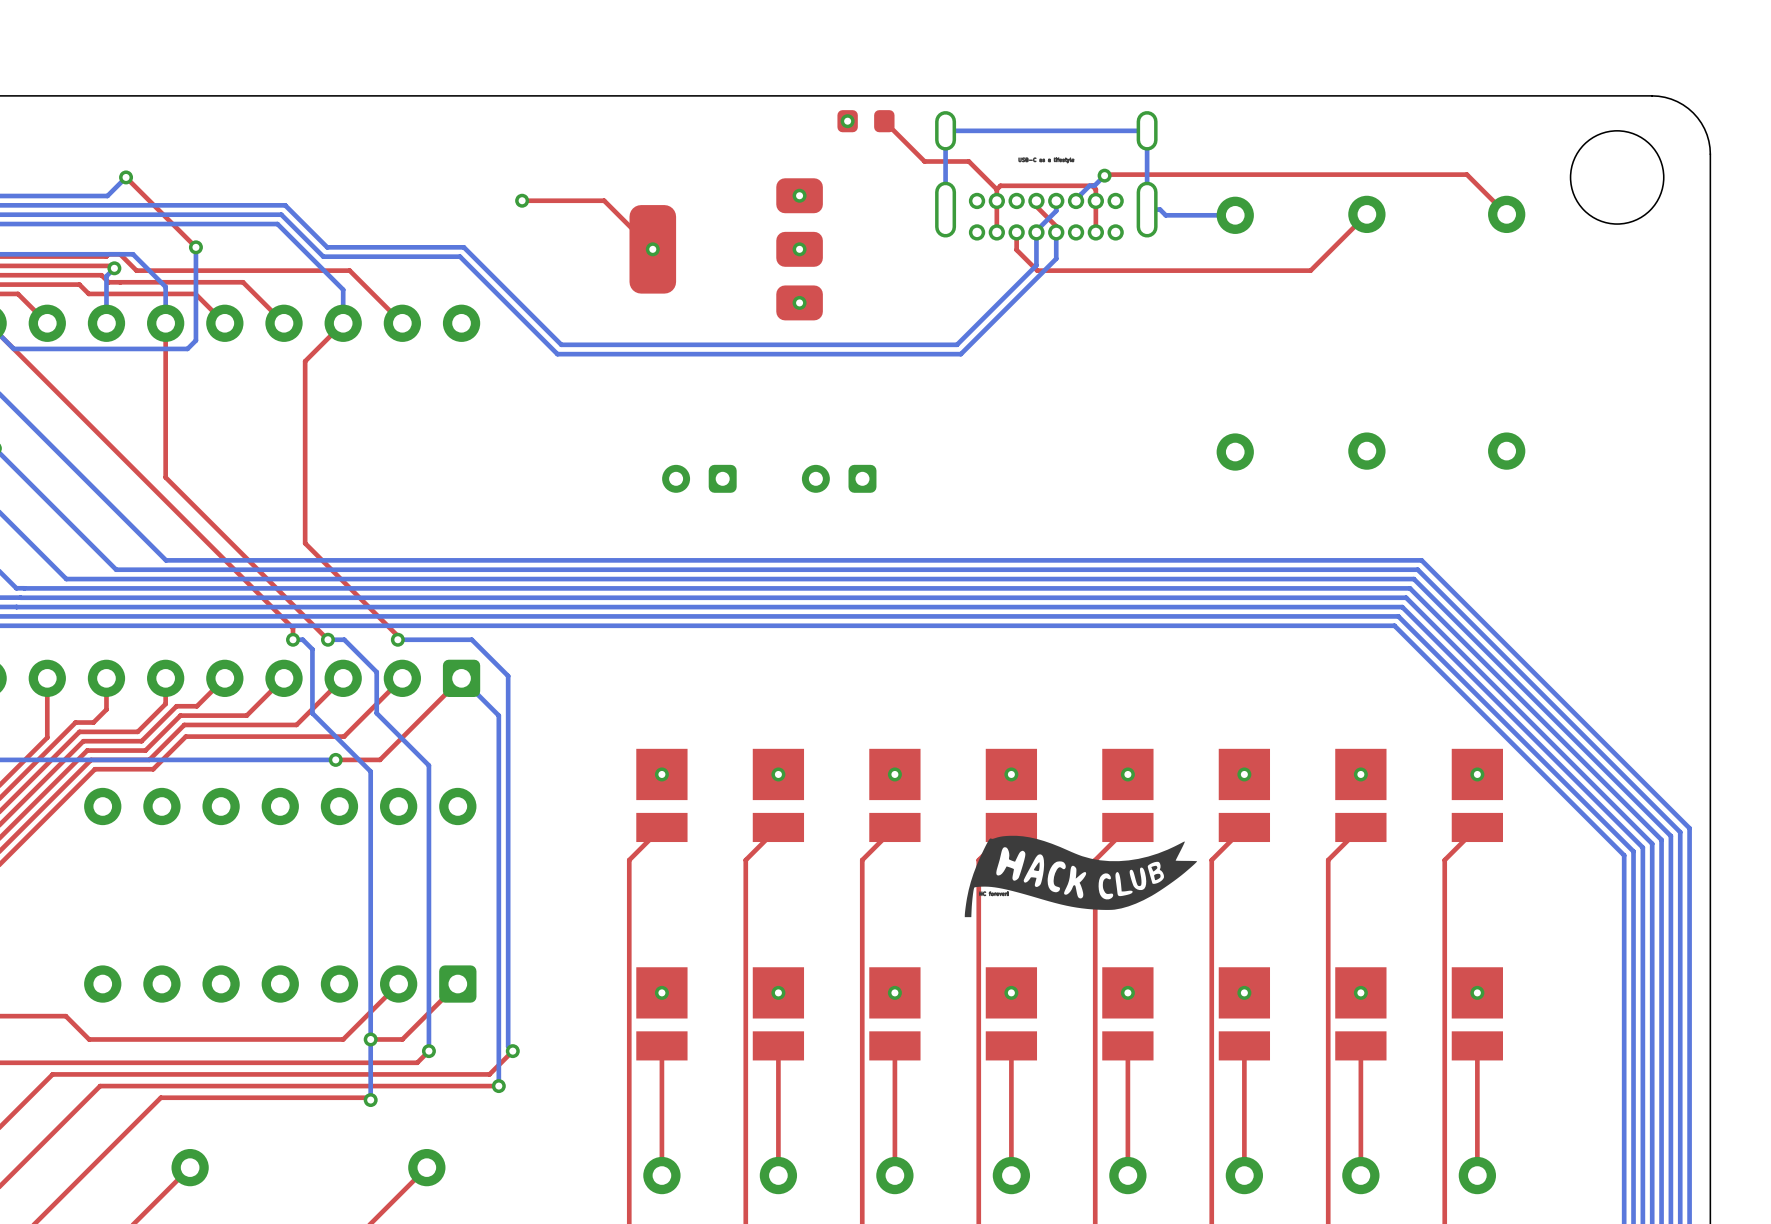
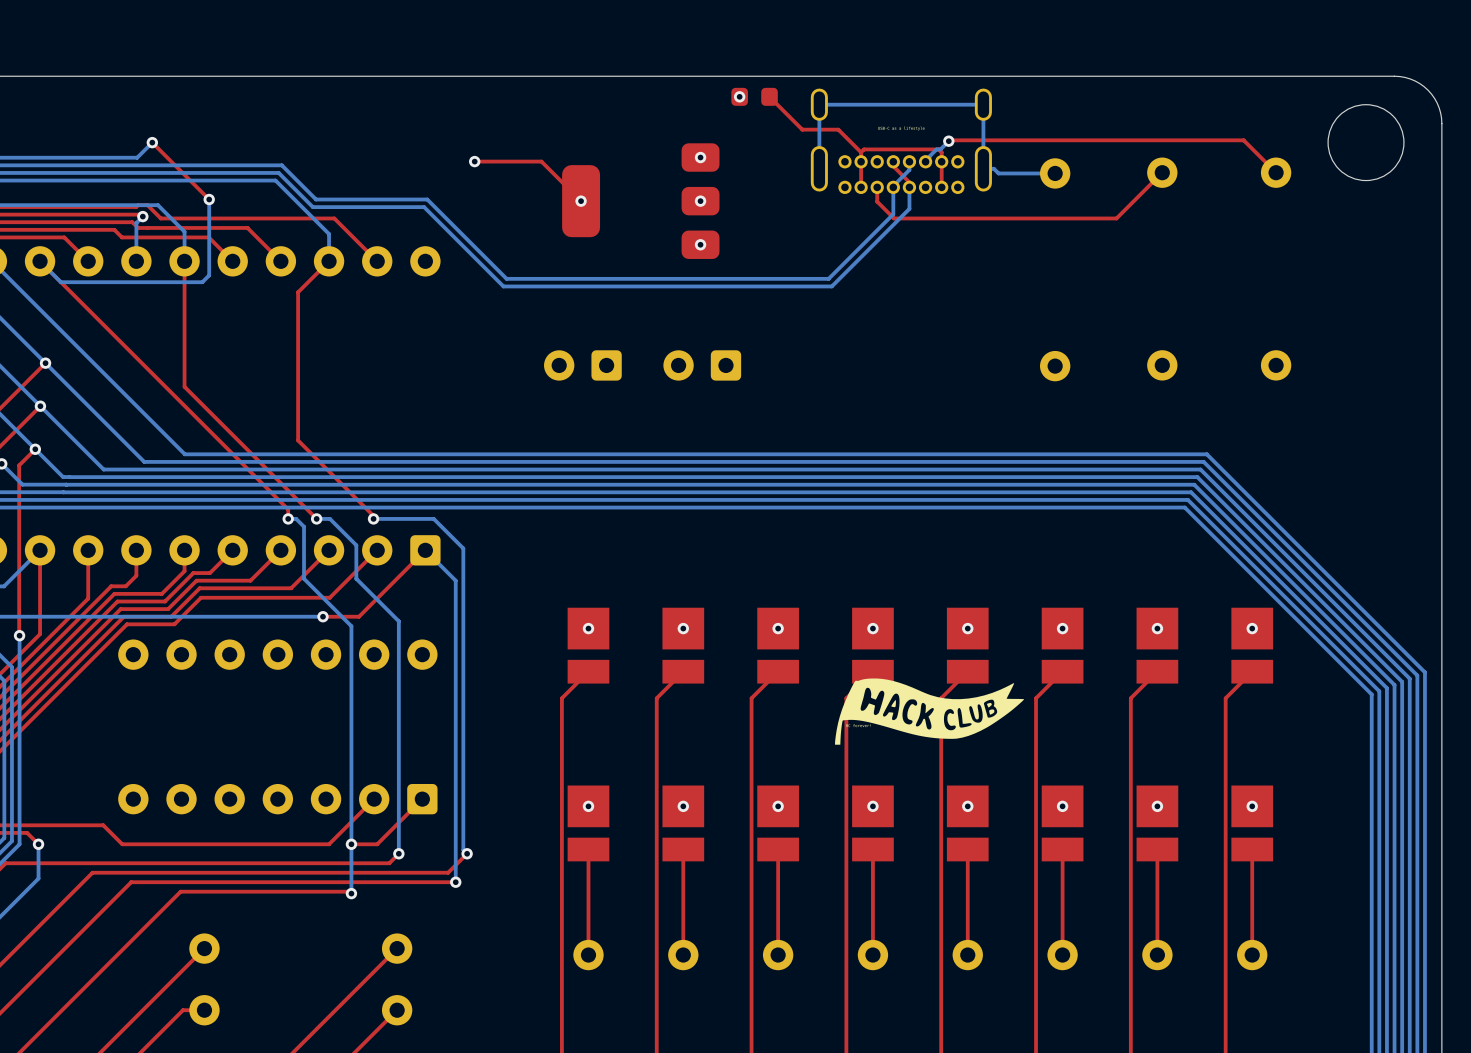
part: none -> (582, 365)
part: none -> (702, 365)
part: (699, 478) -> none
part: (839, 478) -> none

